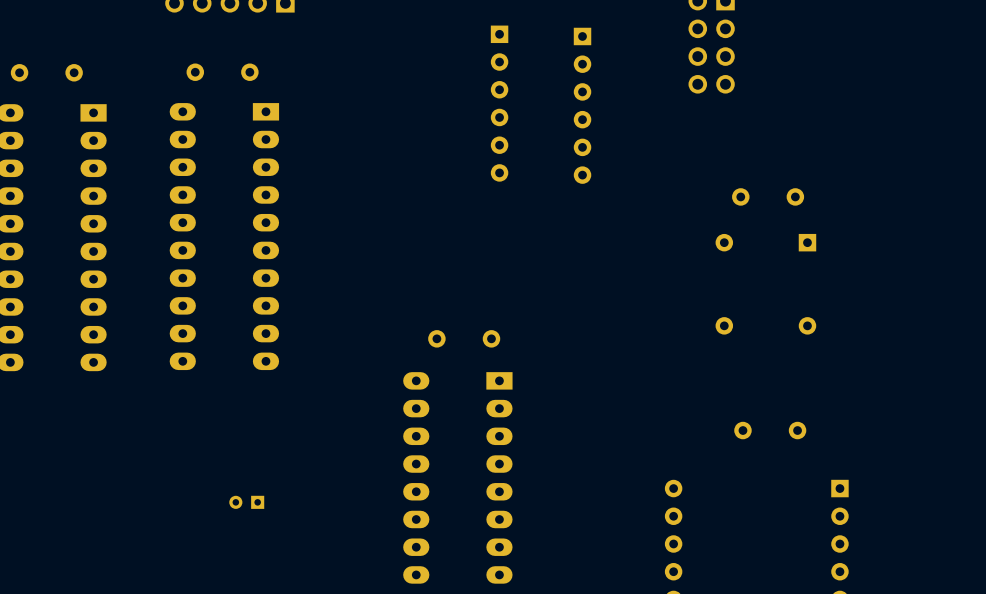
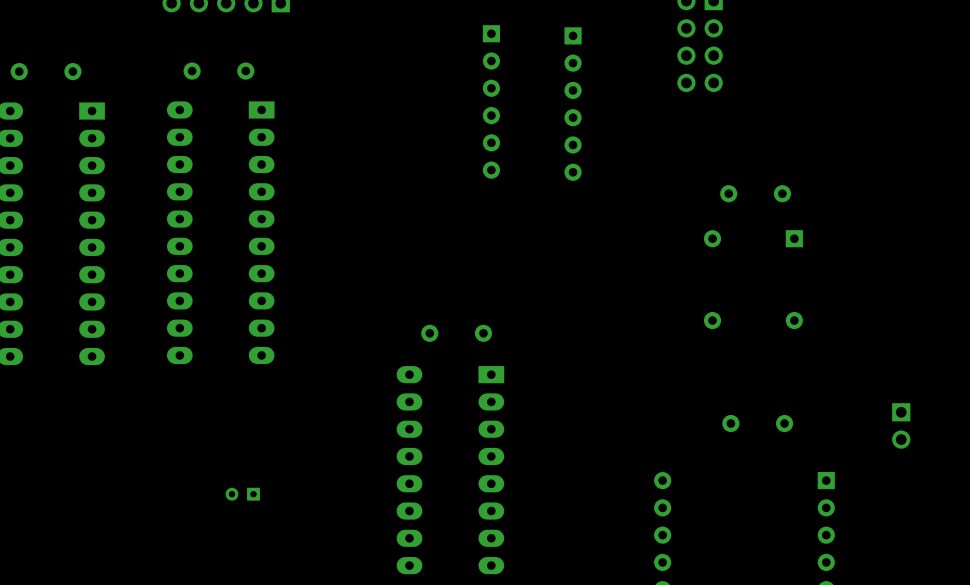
part: none -> (901, 425)

